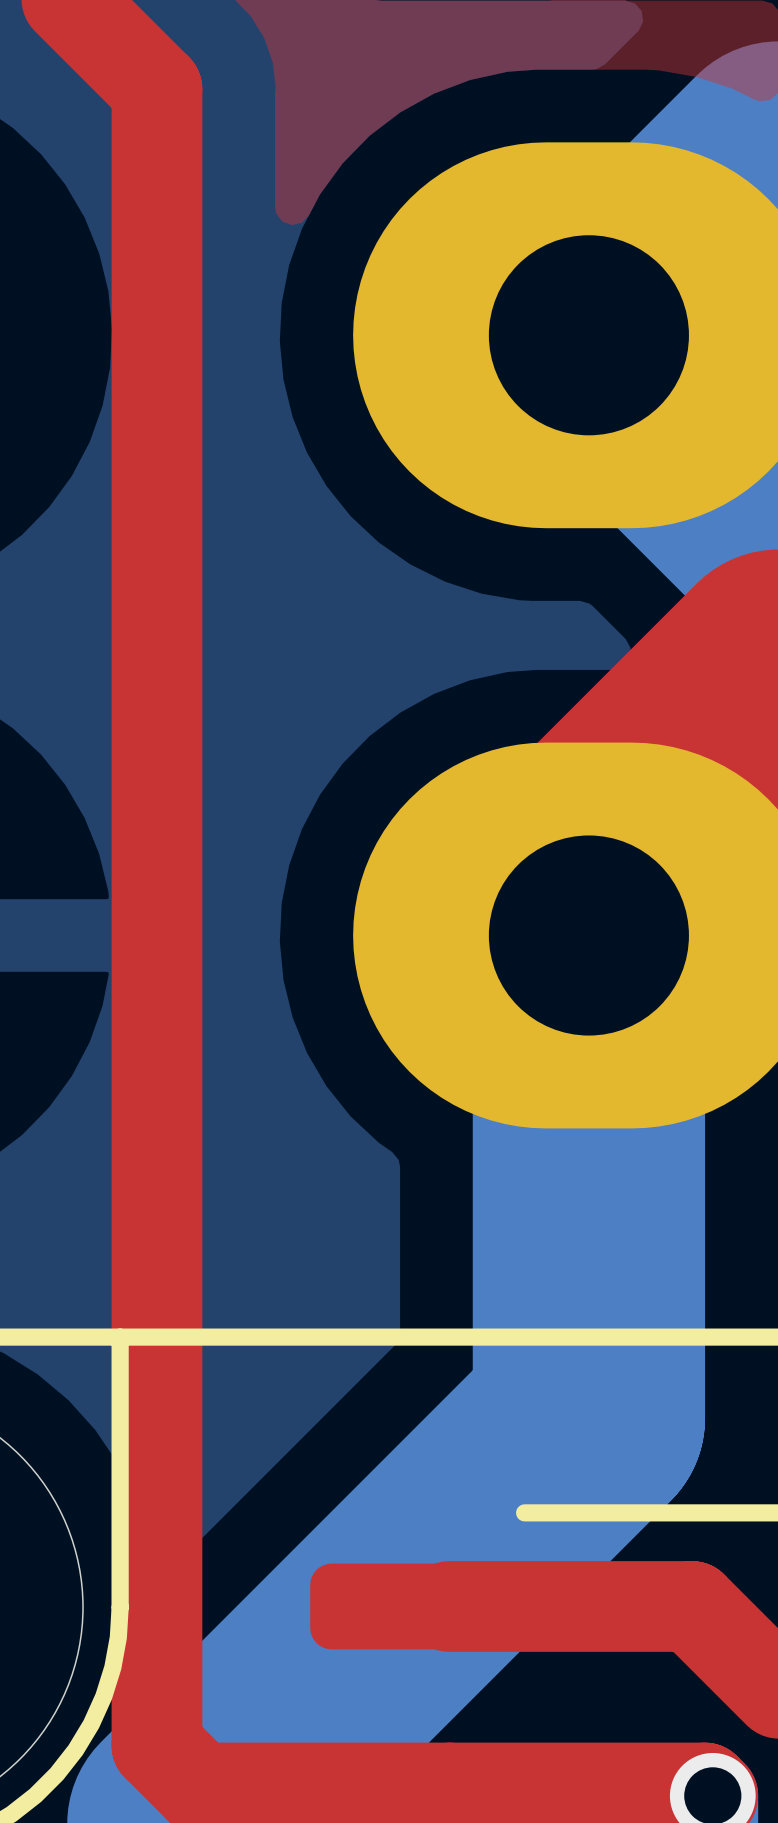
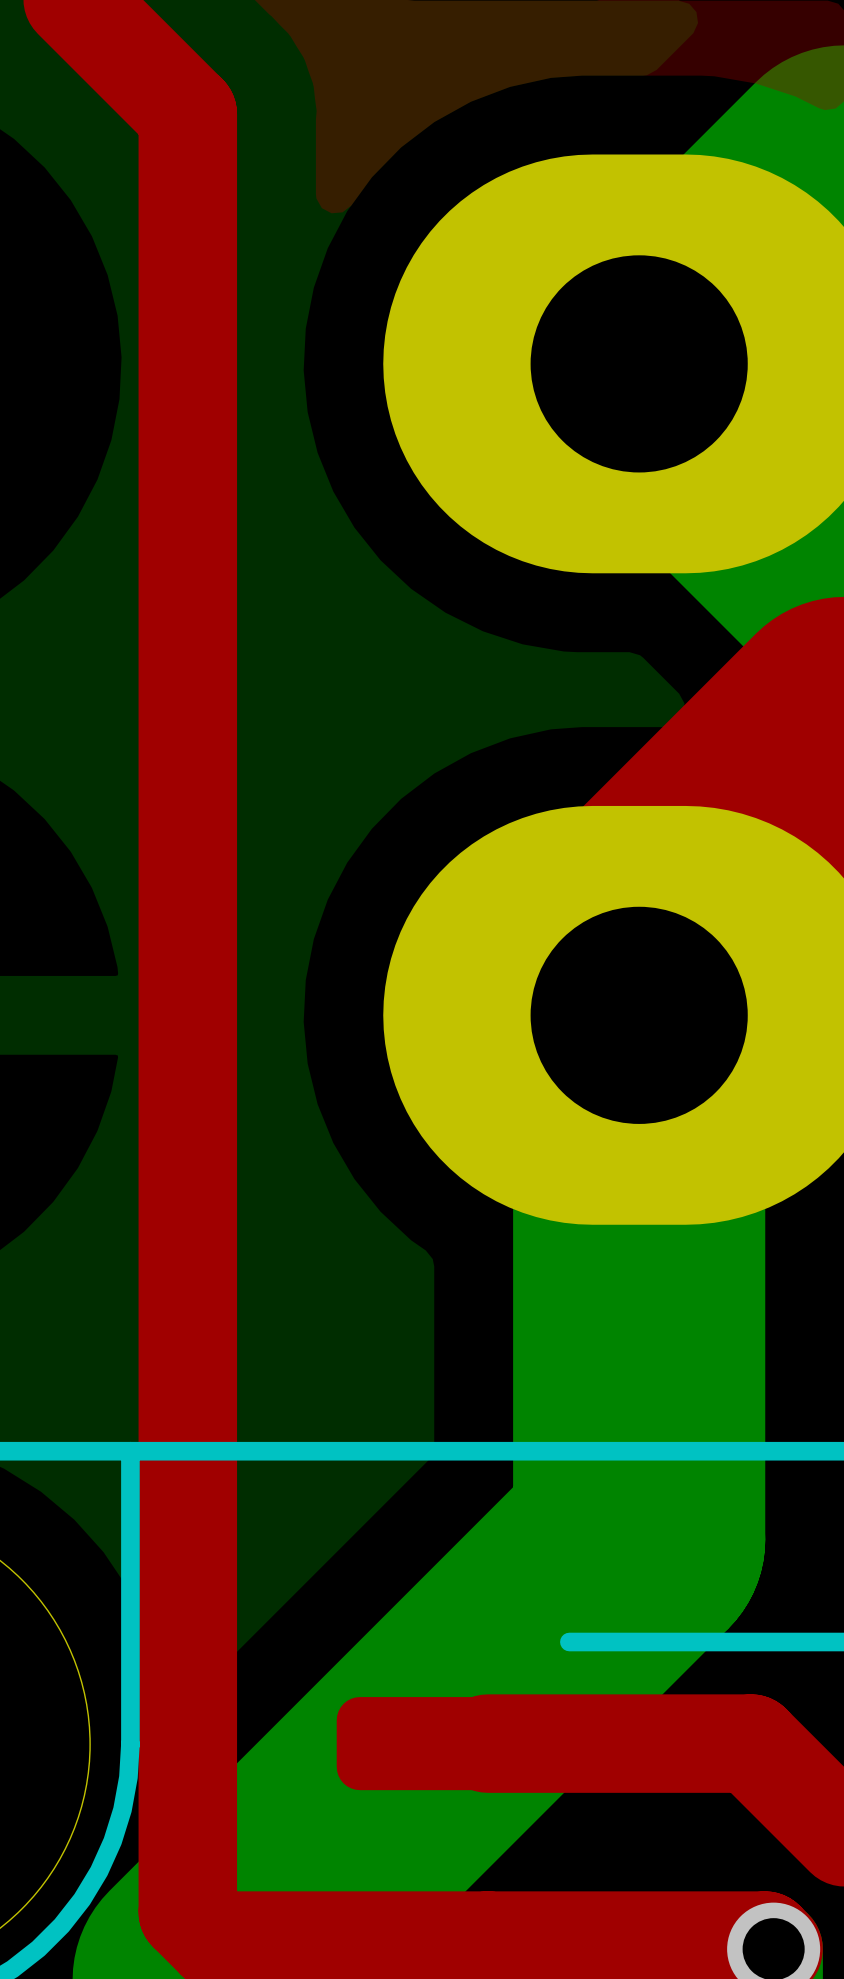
top track: (156, 89) (156, 1745) (173, 1761) -> (170, 96) (187, 114) (187, 1912)

